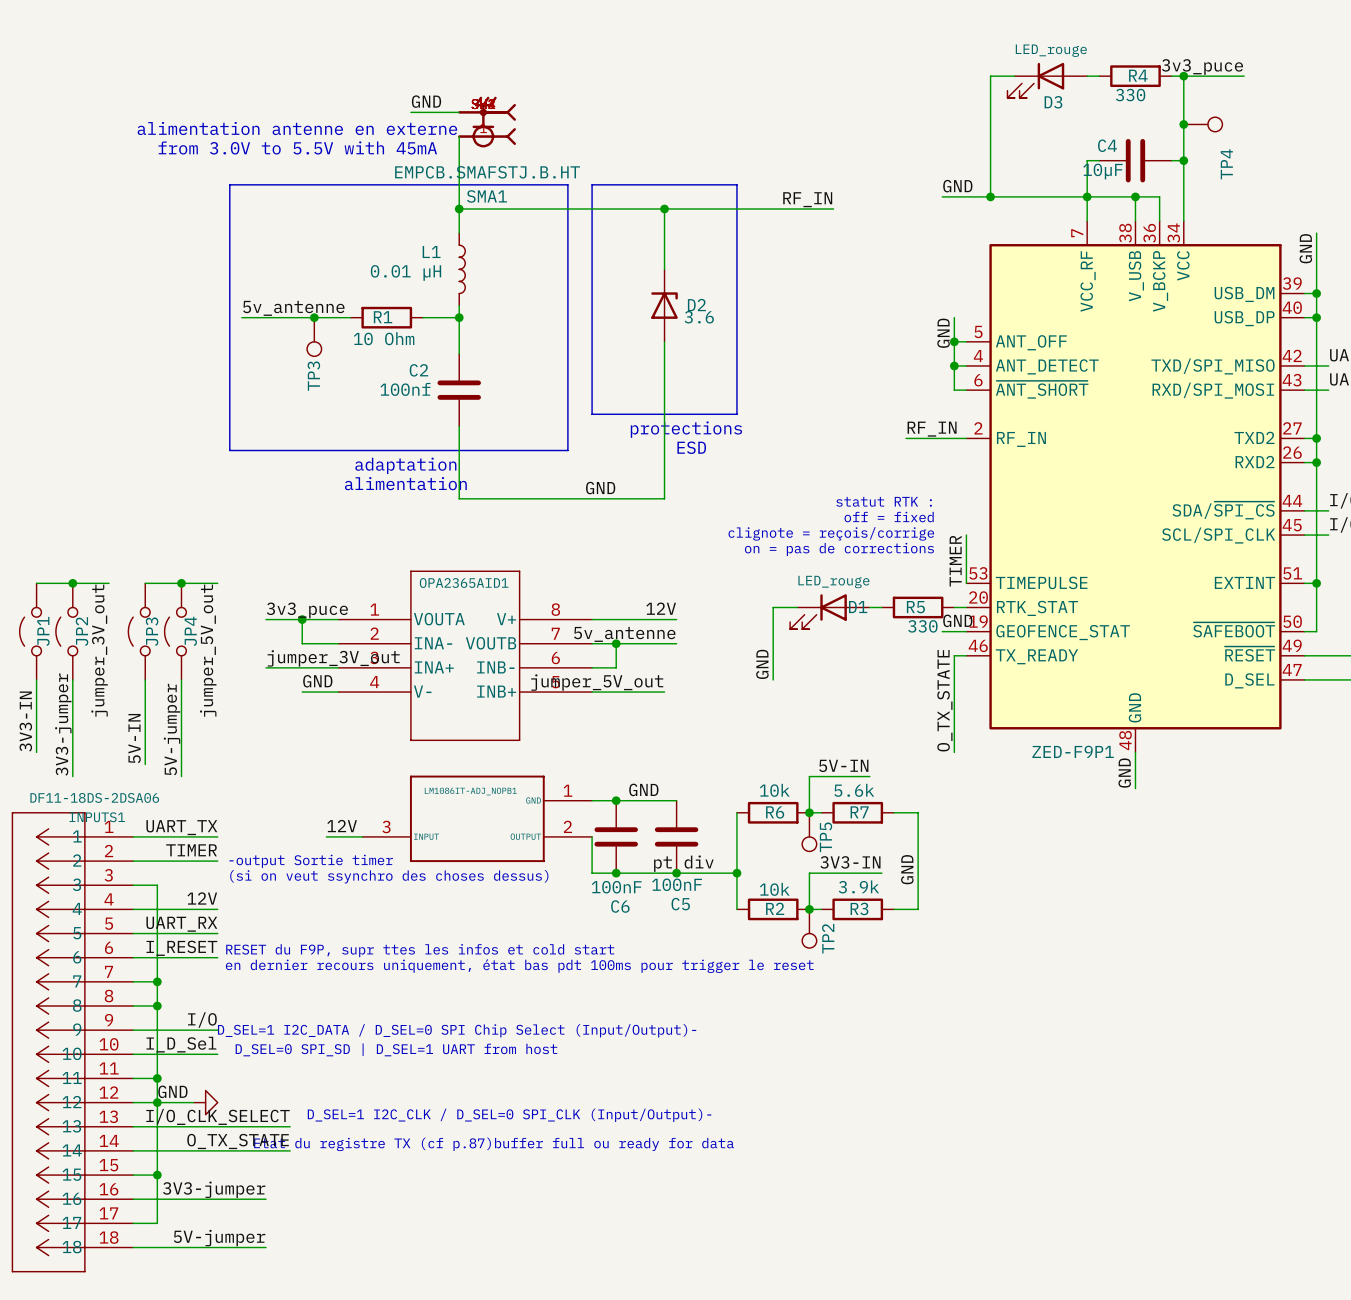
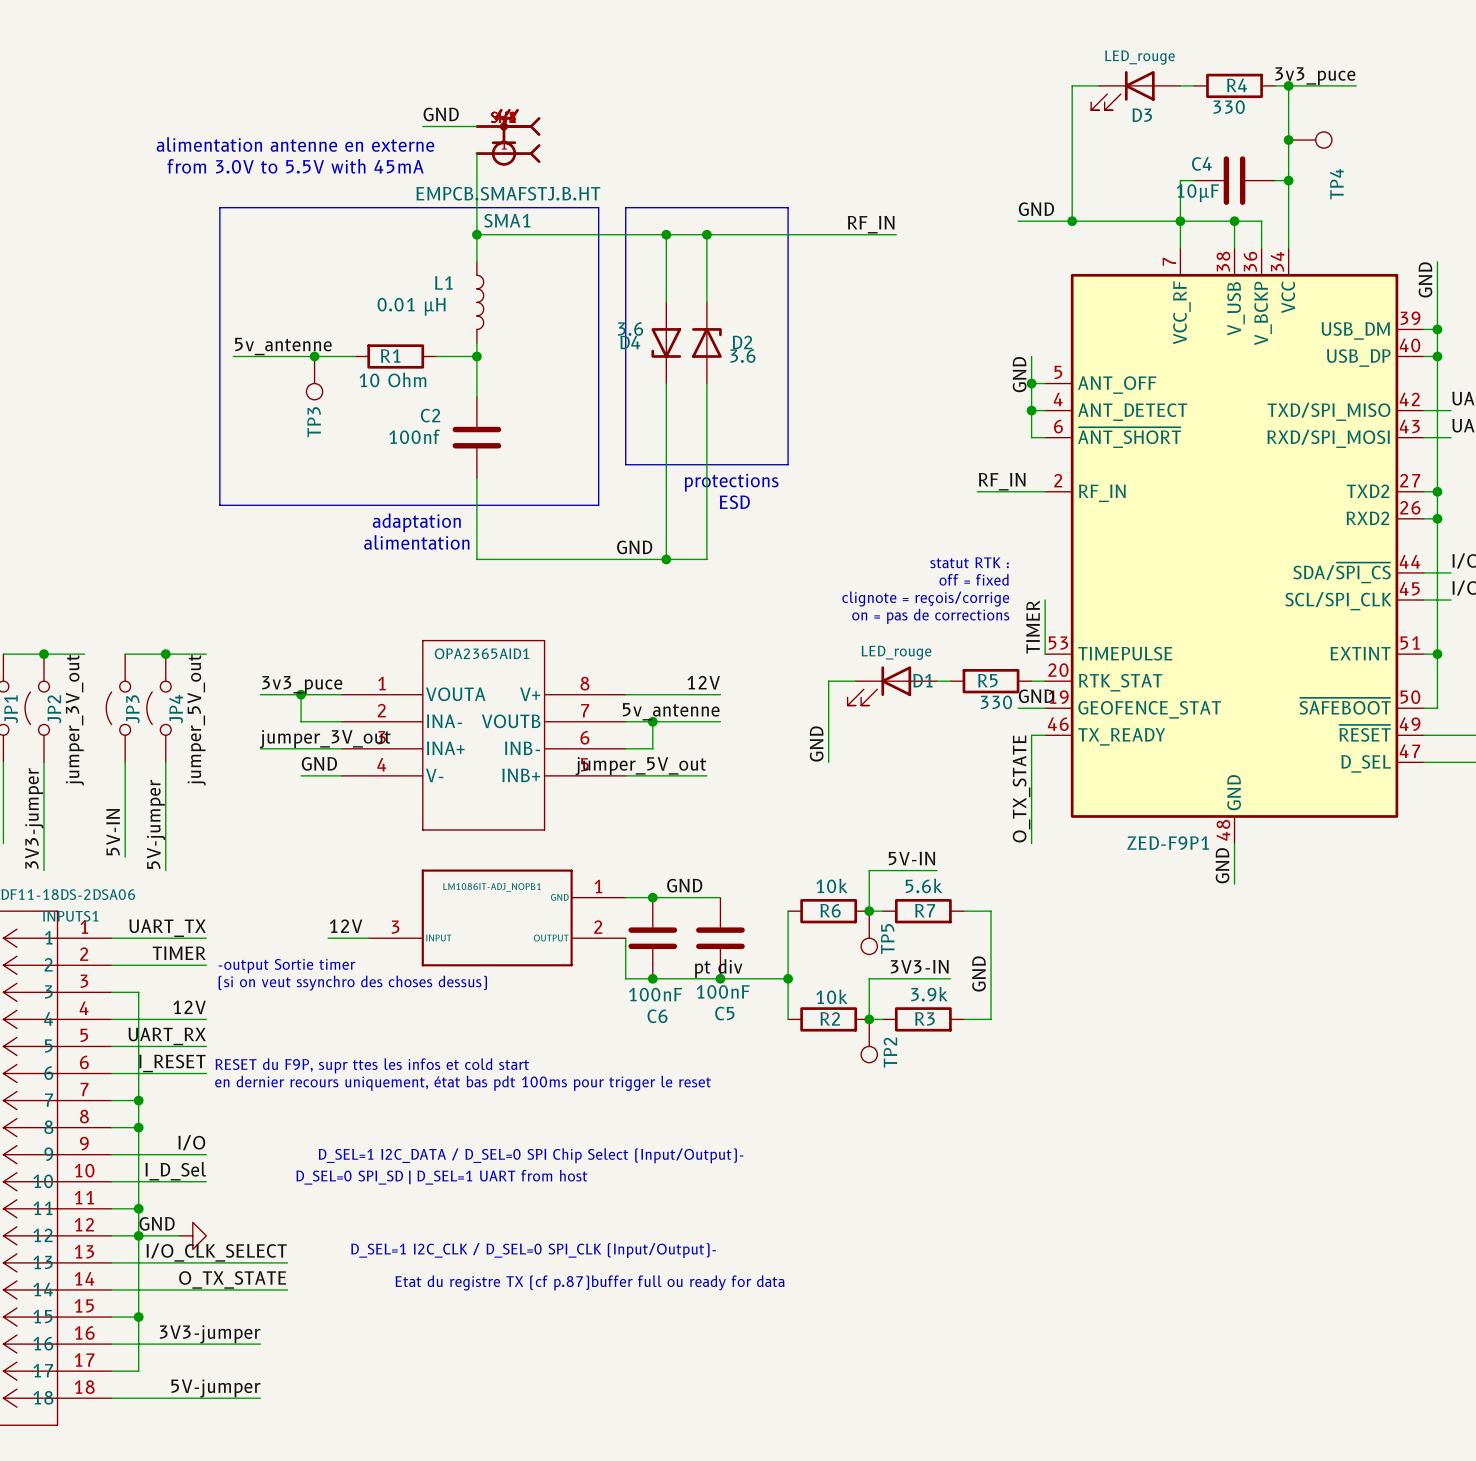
wire: none -> (666, 234) (666, 302)
junction: none -> (666, 234)
D4: none -> 3.6 (666, 342)
wire: none -> (666, 383) (666, 559)
junction: none -> (666, 559)

